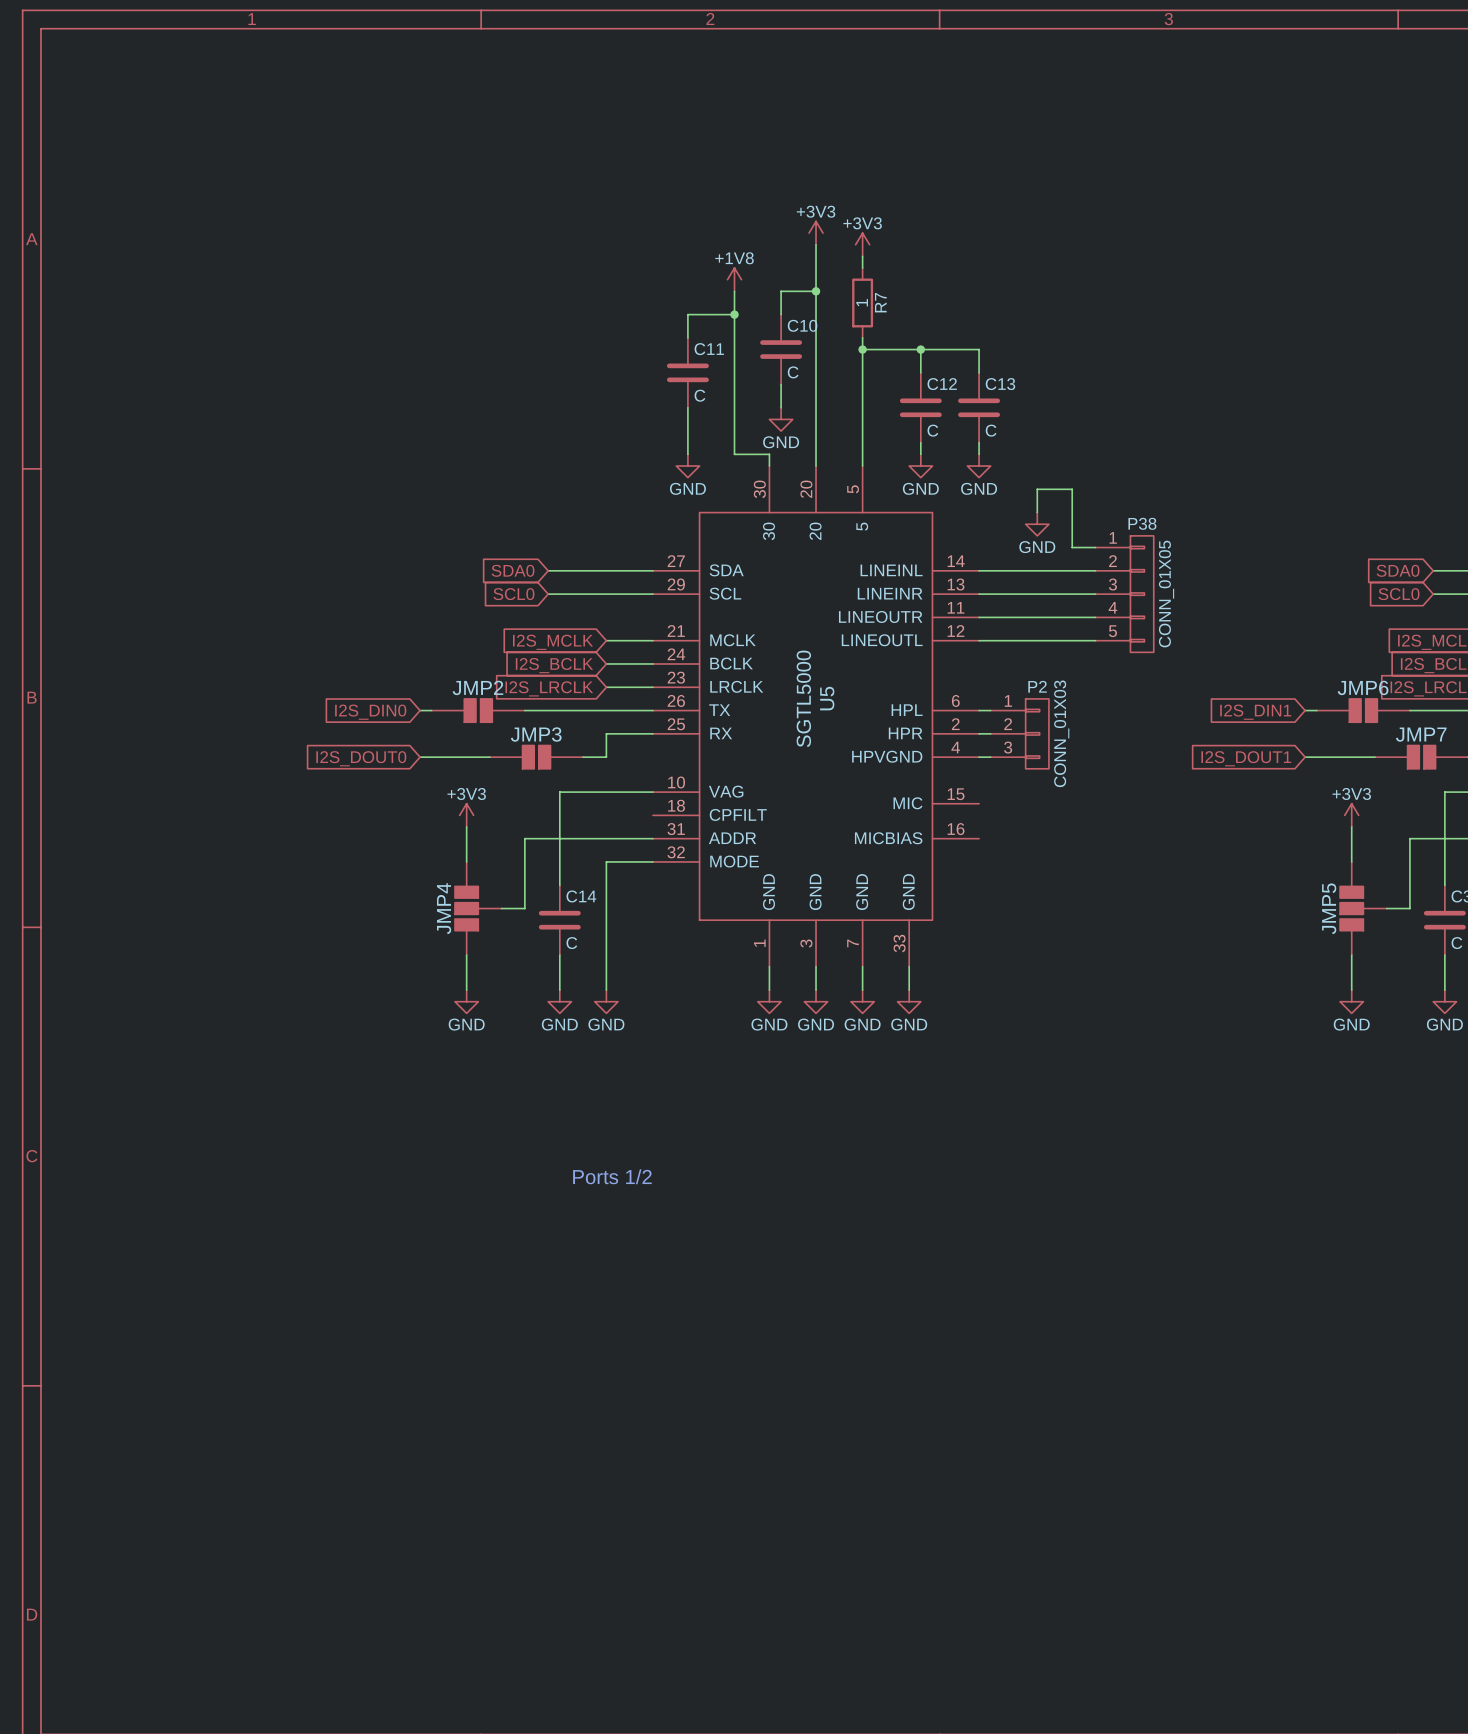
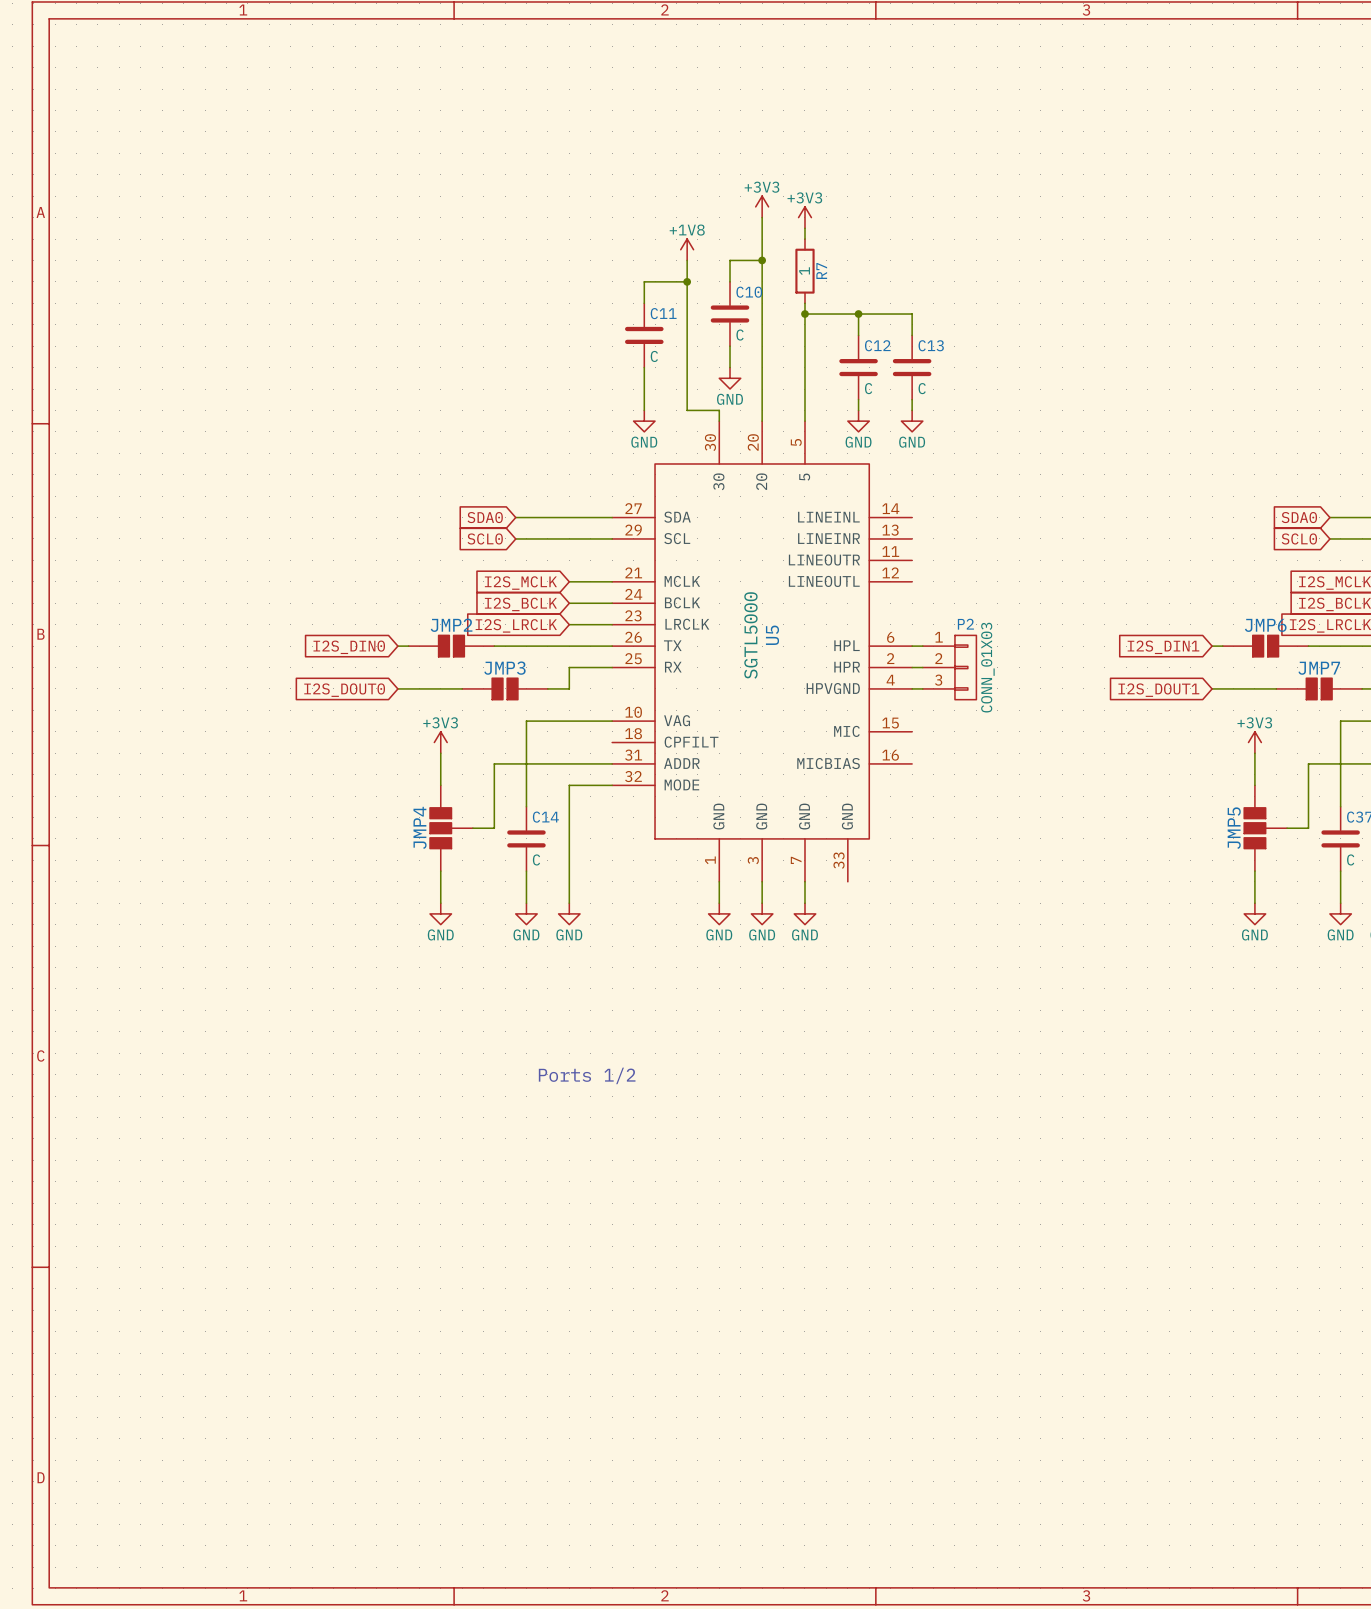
wire: (1037, 512) (1037, 489) (1072, 489) (1072, 547) (1095, 547) -> none
power symbol: GND (1037, 524) -> none
wire: (979, 570) (1095, 570) -> none
wire: (979, 594) (1095, 594) -> none
P38: CONN_01X05 (1124, 594) -> none
wire: (979, 617) (1095, 617) -> none
wire: (979, 640) (1095, 640) -> none
wire: (909, 966) (909, 990) -> none
power symbol: GND (909, 1001) -> none

